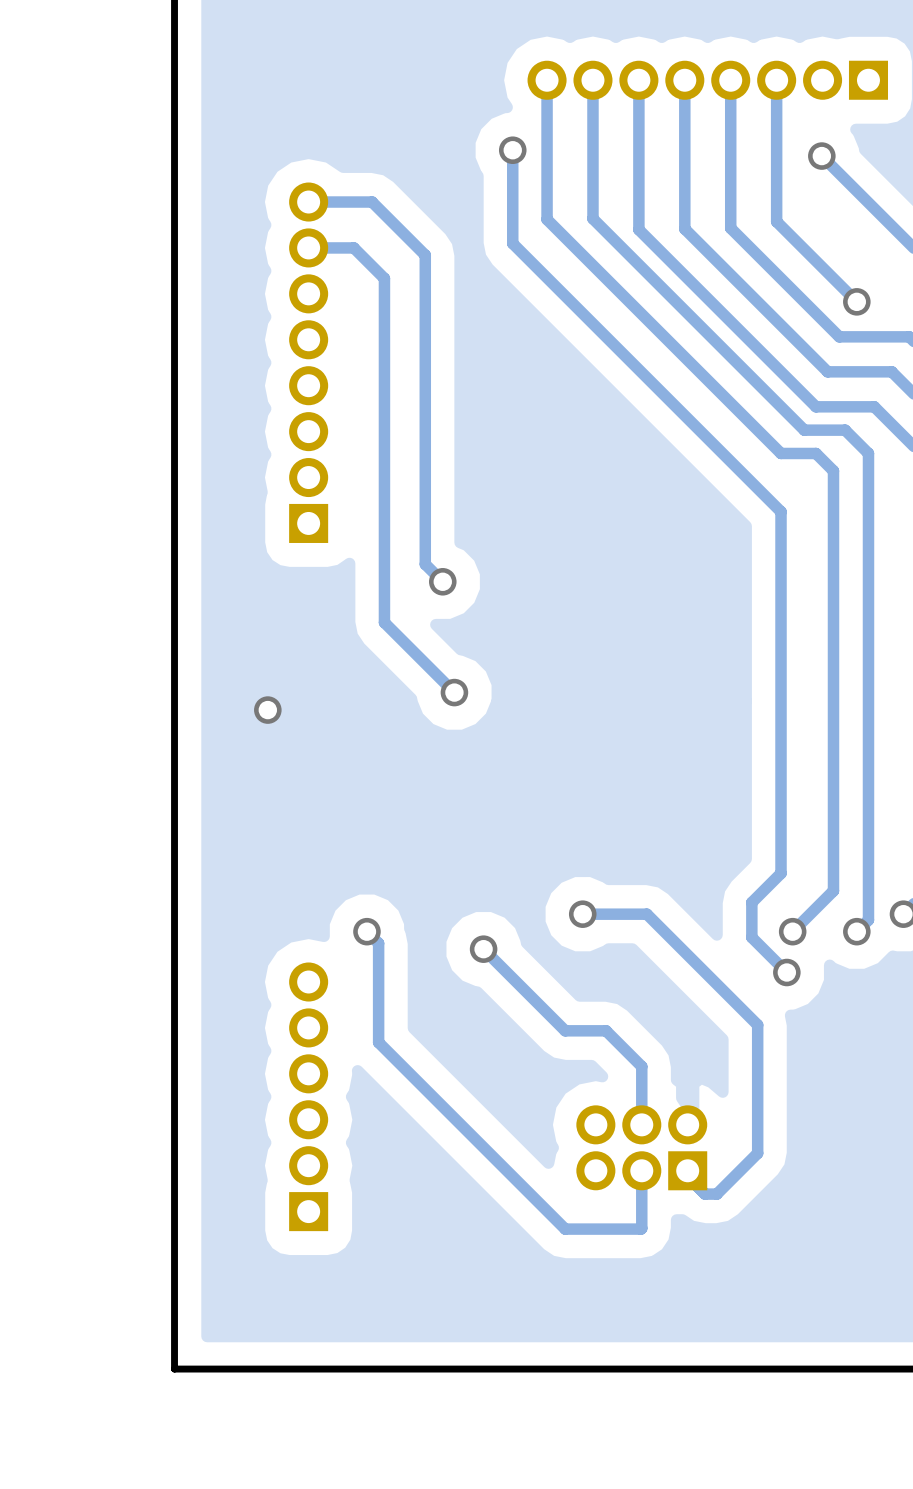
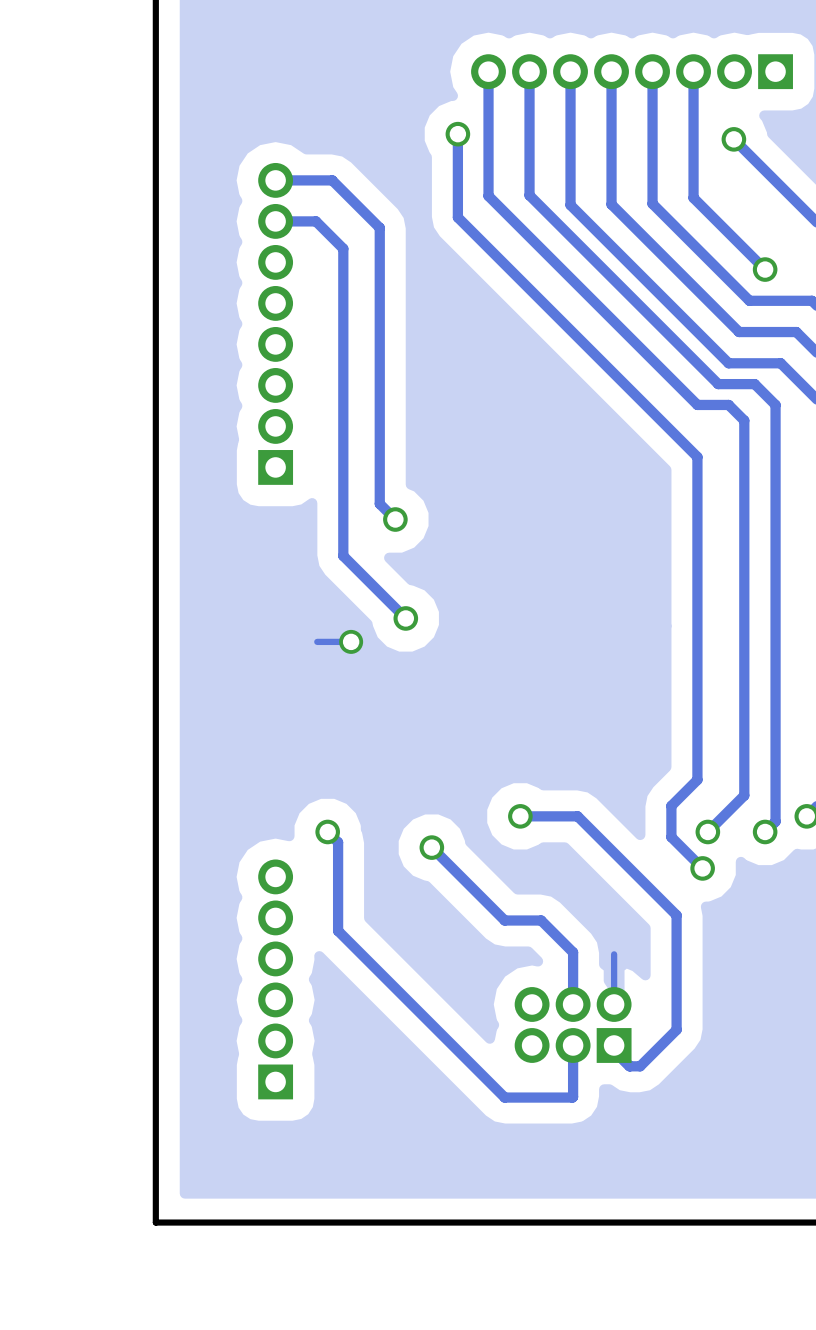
via: (267, 710) -> none
track: none -> (351, 641) (317, 641)
via: none -> (351, 641)
track: none -> (614, 954) (614, 1004)

